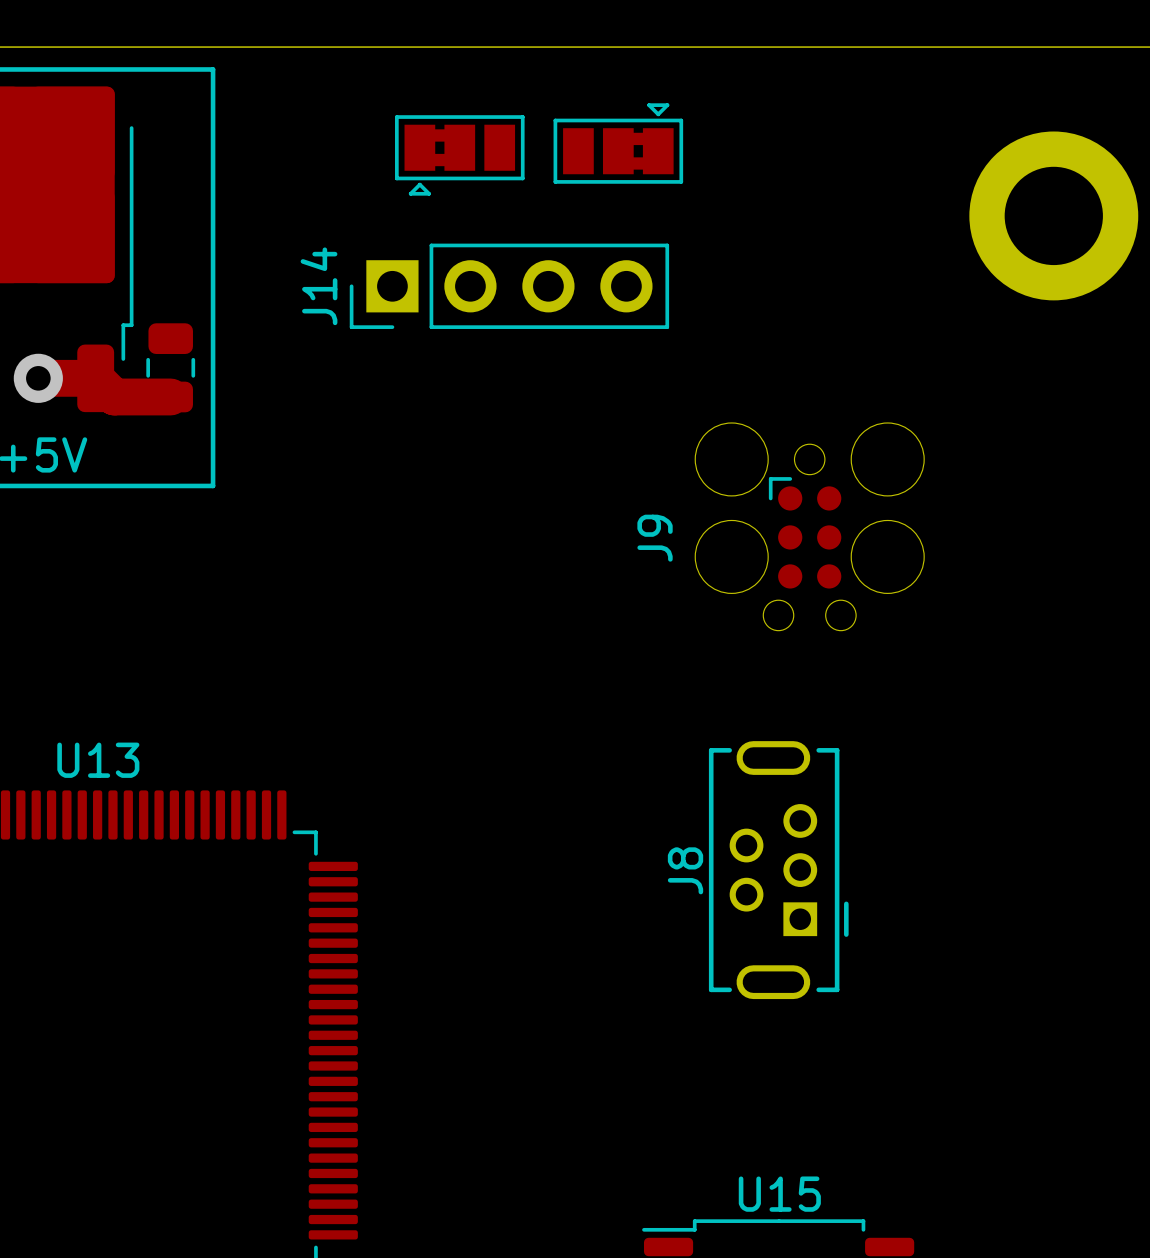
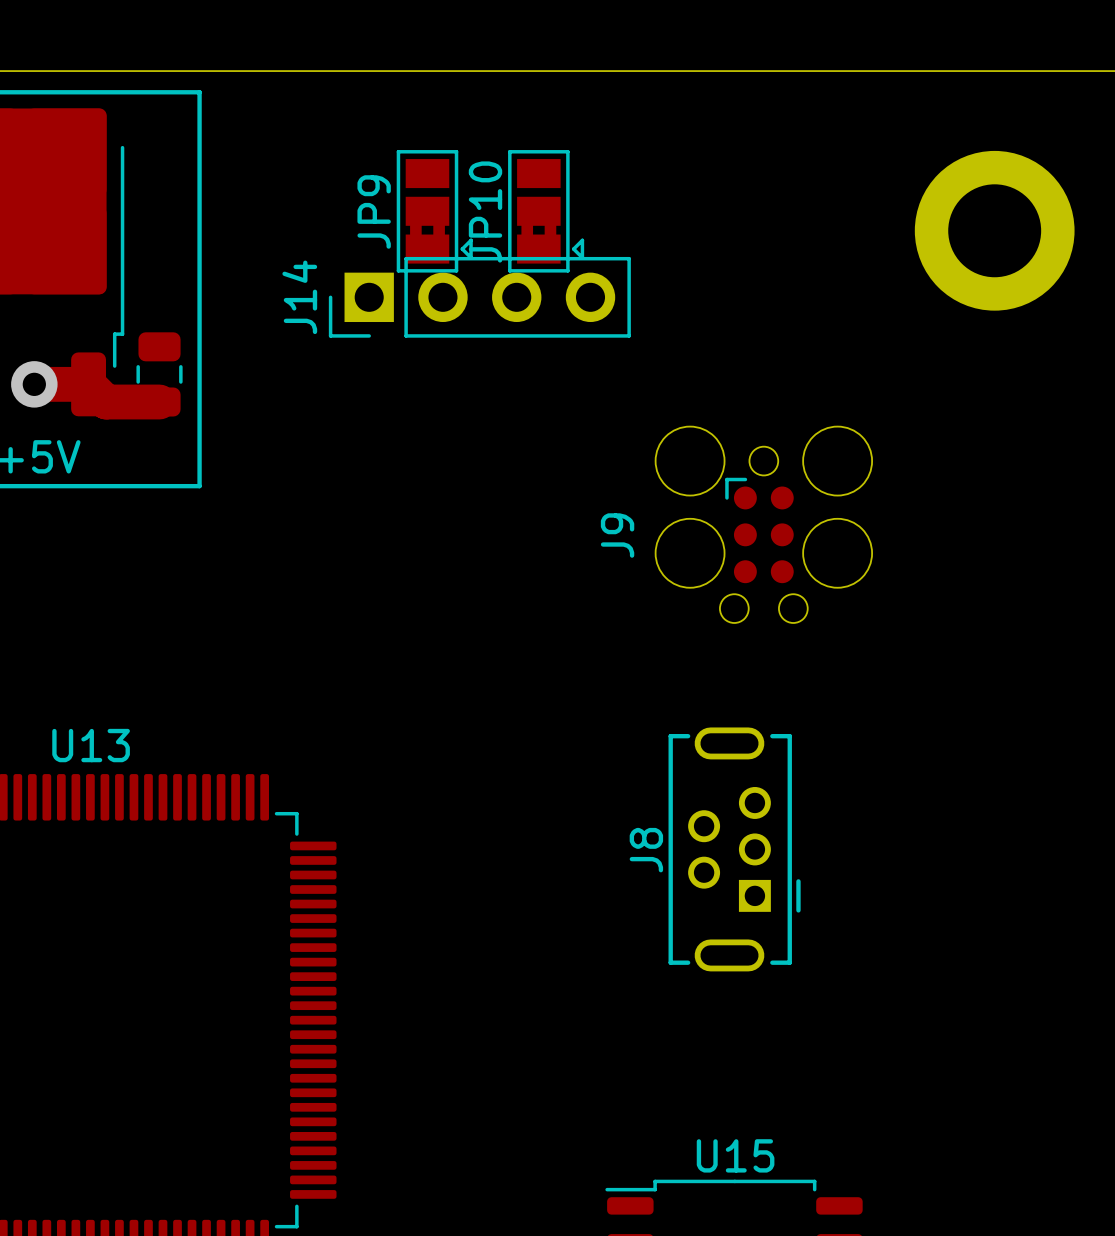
part: (618, 143) -> none
part: (459, 155) -> none
JP9: none -> (434, 211)
JP10: none -> (546, 211)

